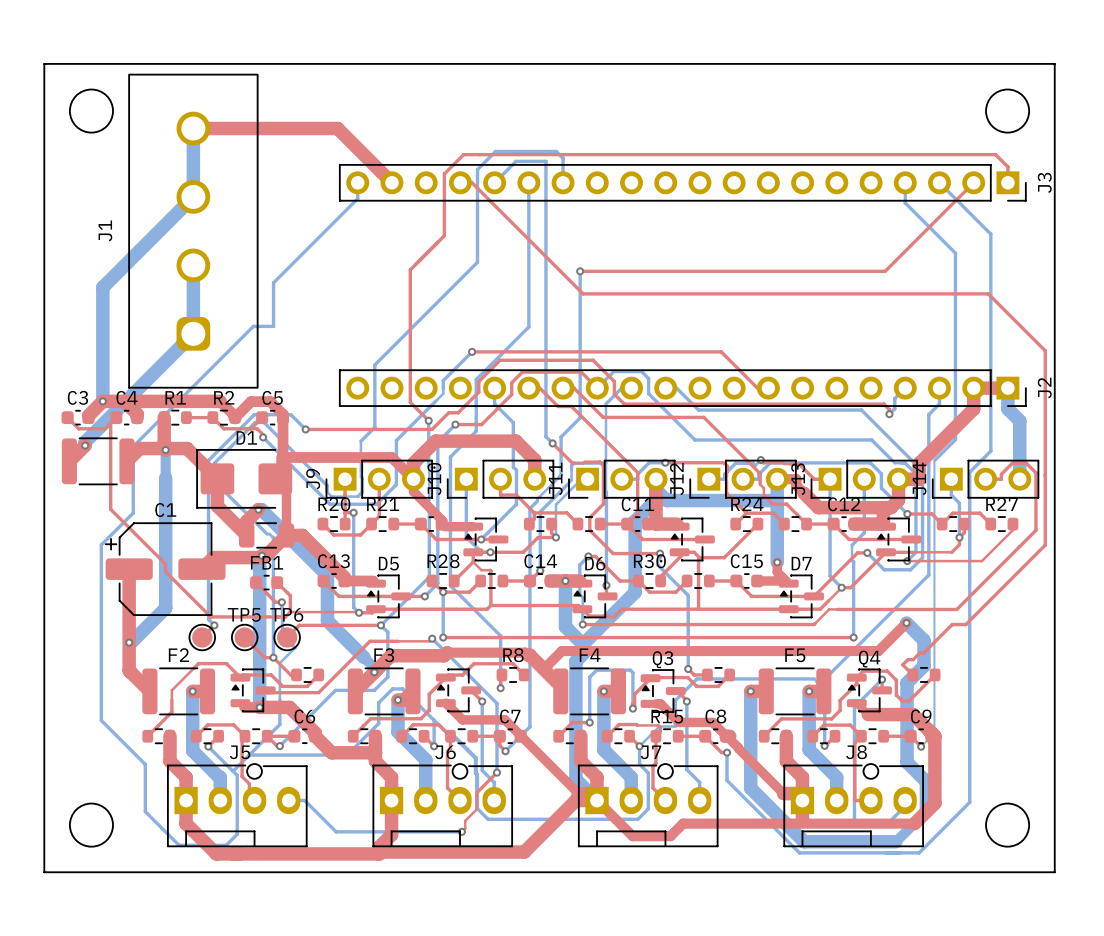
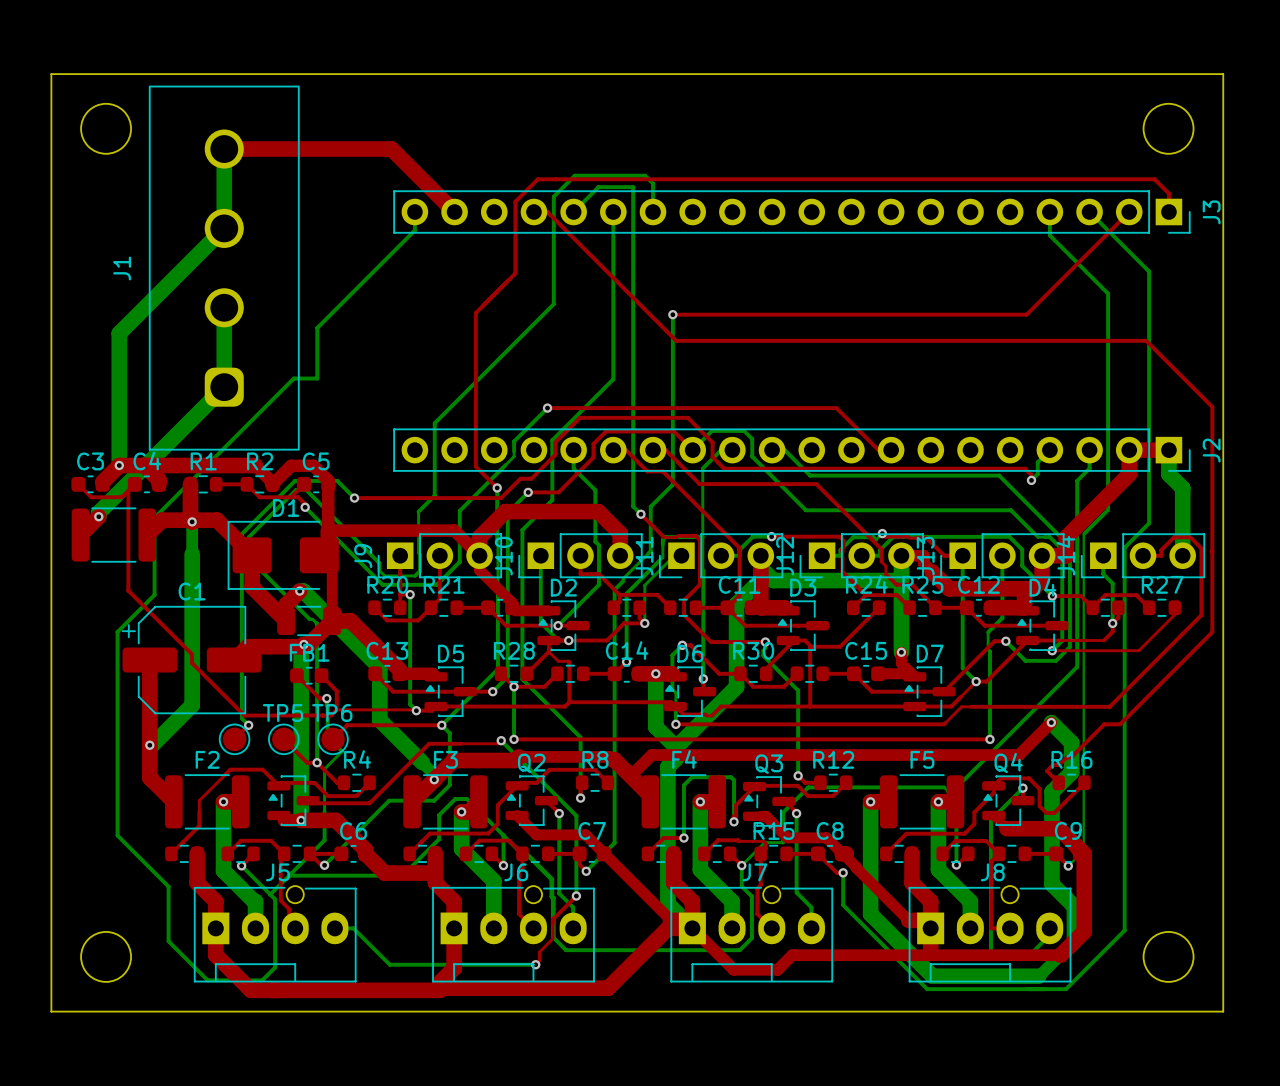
R25 name: none -> R25 (922, 584)
D2 name: none -> D2 (563, 587)
D3 name: none -> D3 (803, 587)
D4 name: none -> D4 (1042, 587)
R4 name: none -> R4 (357, 759)
R12 name: none -> R12 (833, 759)
R16 name: none -> R16 (1071, 759)
Q2 name: none -> Q2 (531, 763)

